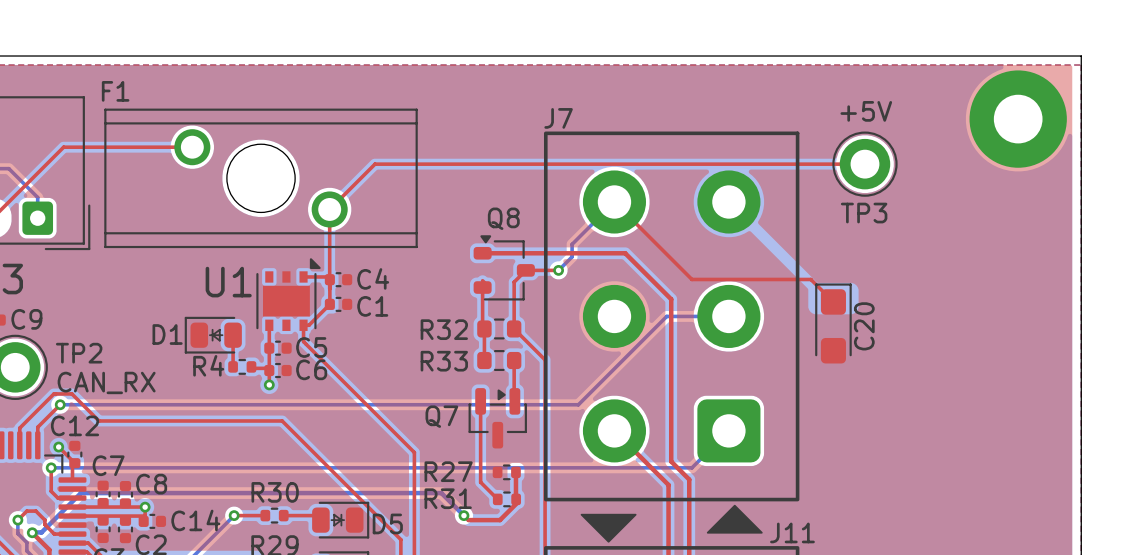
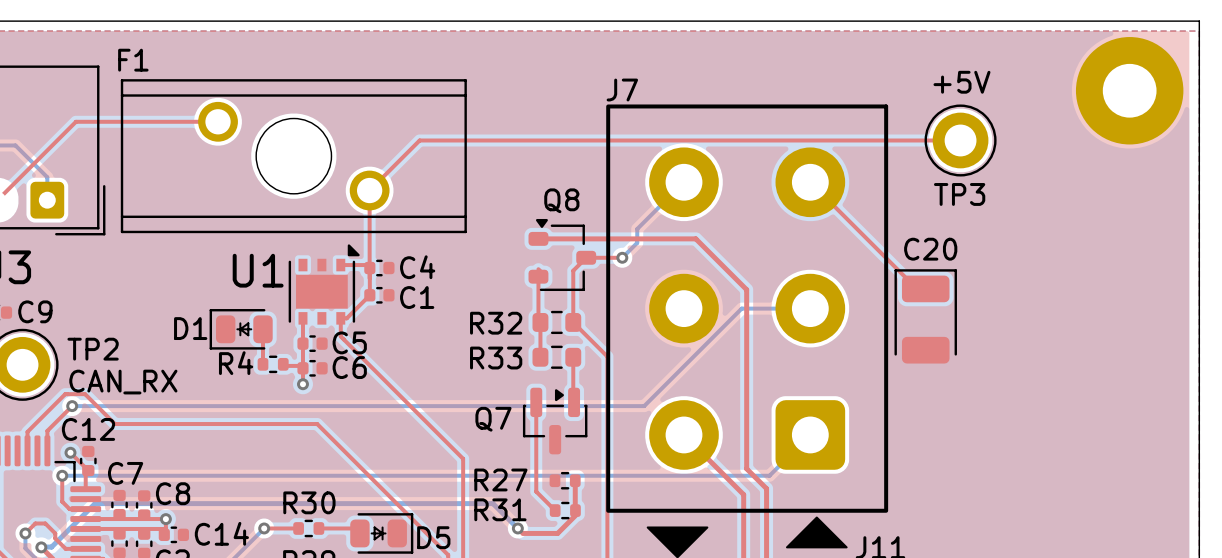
top track: (614, 201) (691, 279) (810, 279) (833, 301) -> none
top track: none -> (810, 182) (916, 288)
C20 footprint: [815, 283, 852, 364] -> [894, 269, 957, 364]
C20 name rotation: 0° (864, 326) -> 90° clockwise (930, 249)
C20 name position: C20 (864, 326) -> C20 (930, 249)

